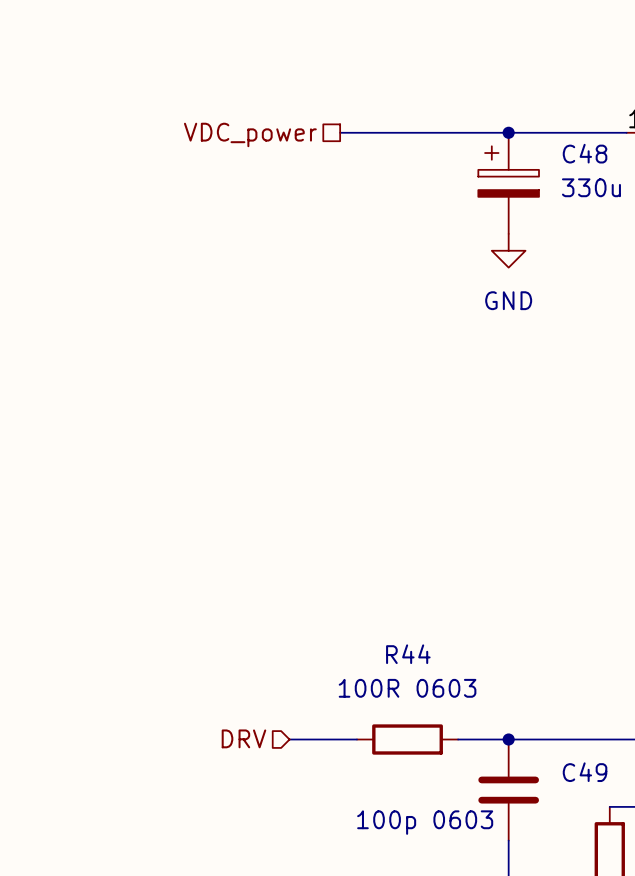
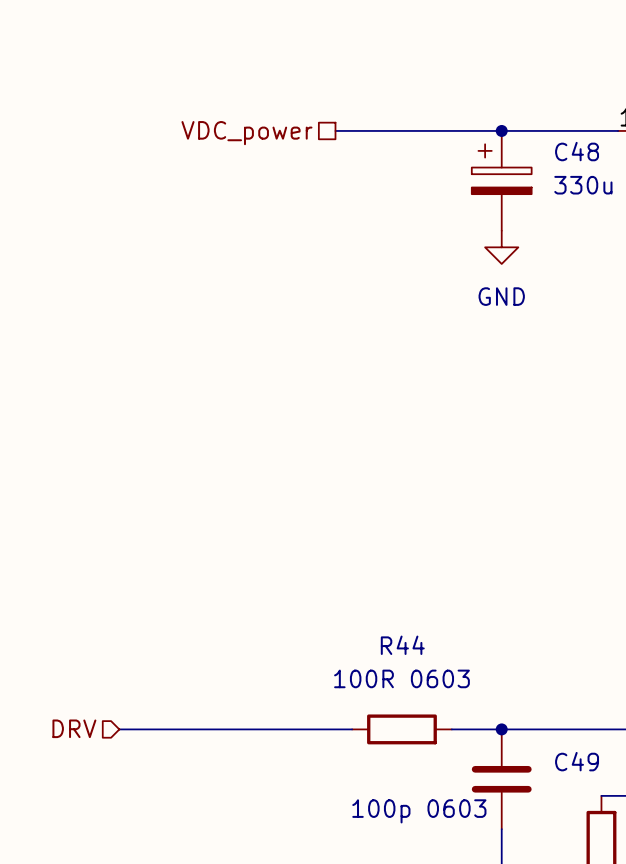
hierarchical label position: DRV (243, 738) -> DRV (74, 728)
wire: none -> (119, 729) (285, 729)

